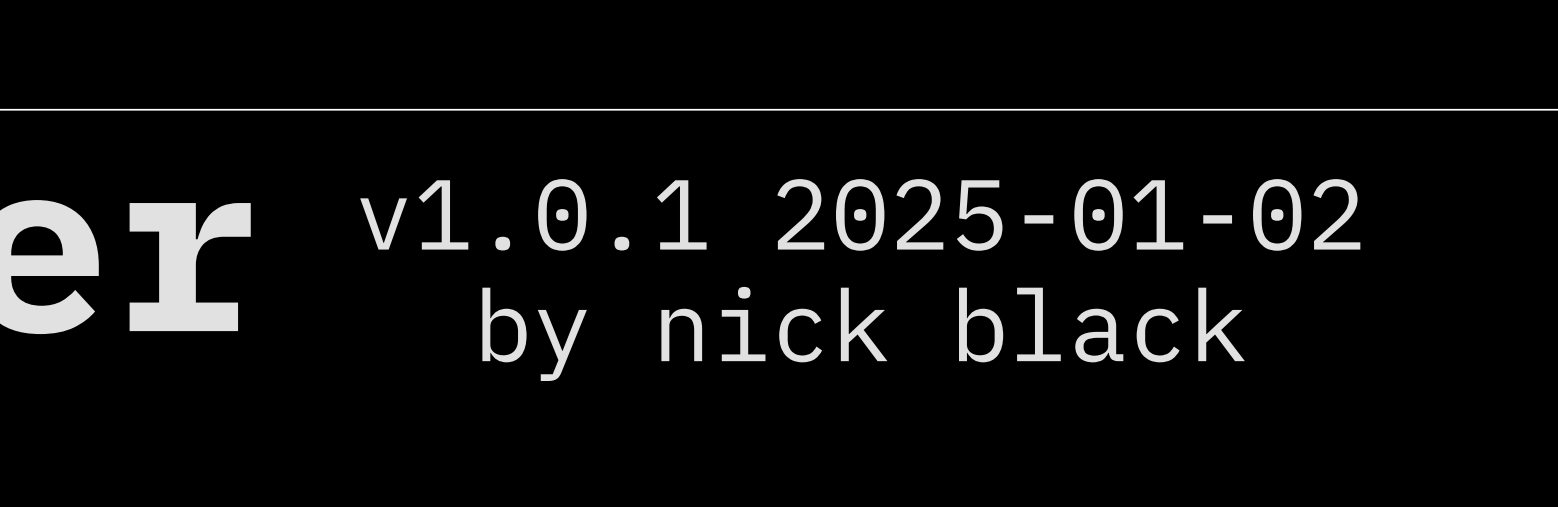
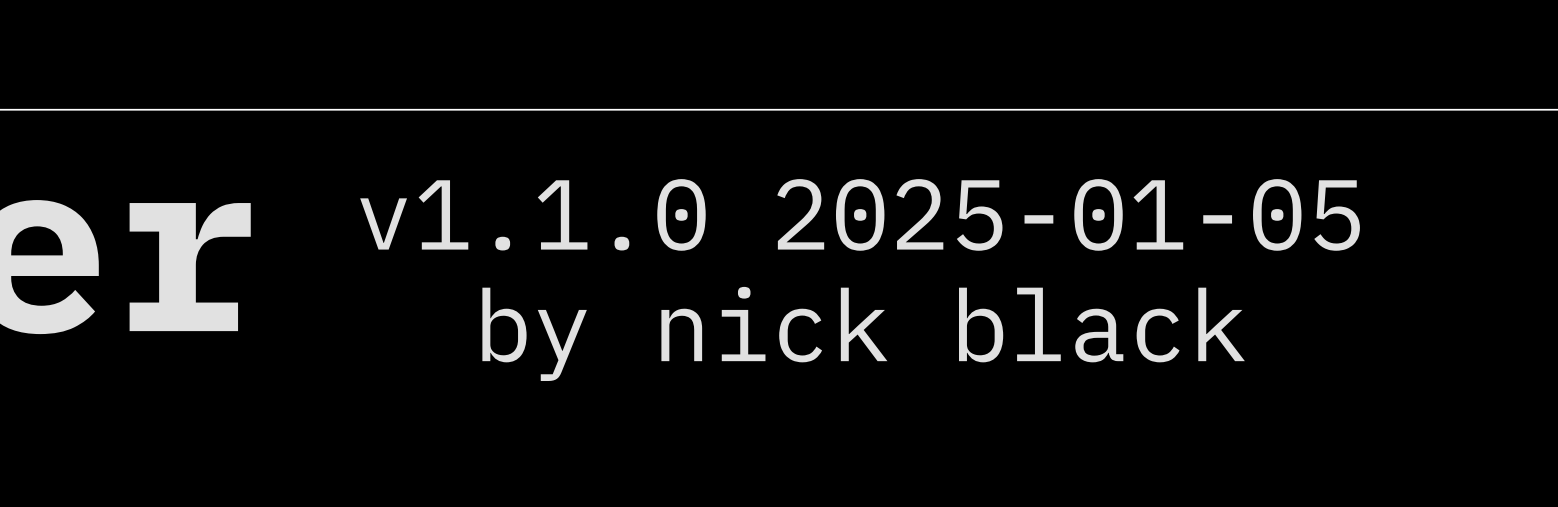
text: v1.0.1 2025-01-02 (860, 214) -> v1.1.0 2025-01-05 (860, 214)

